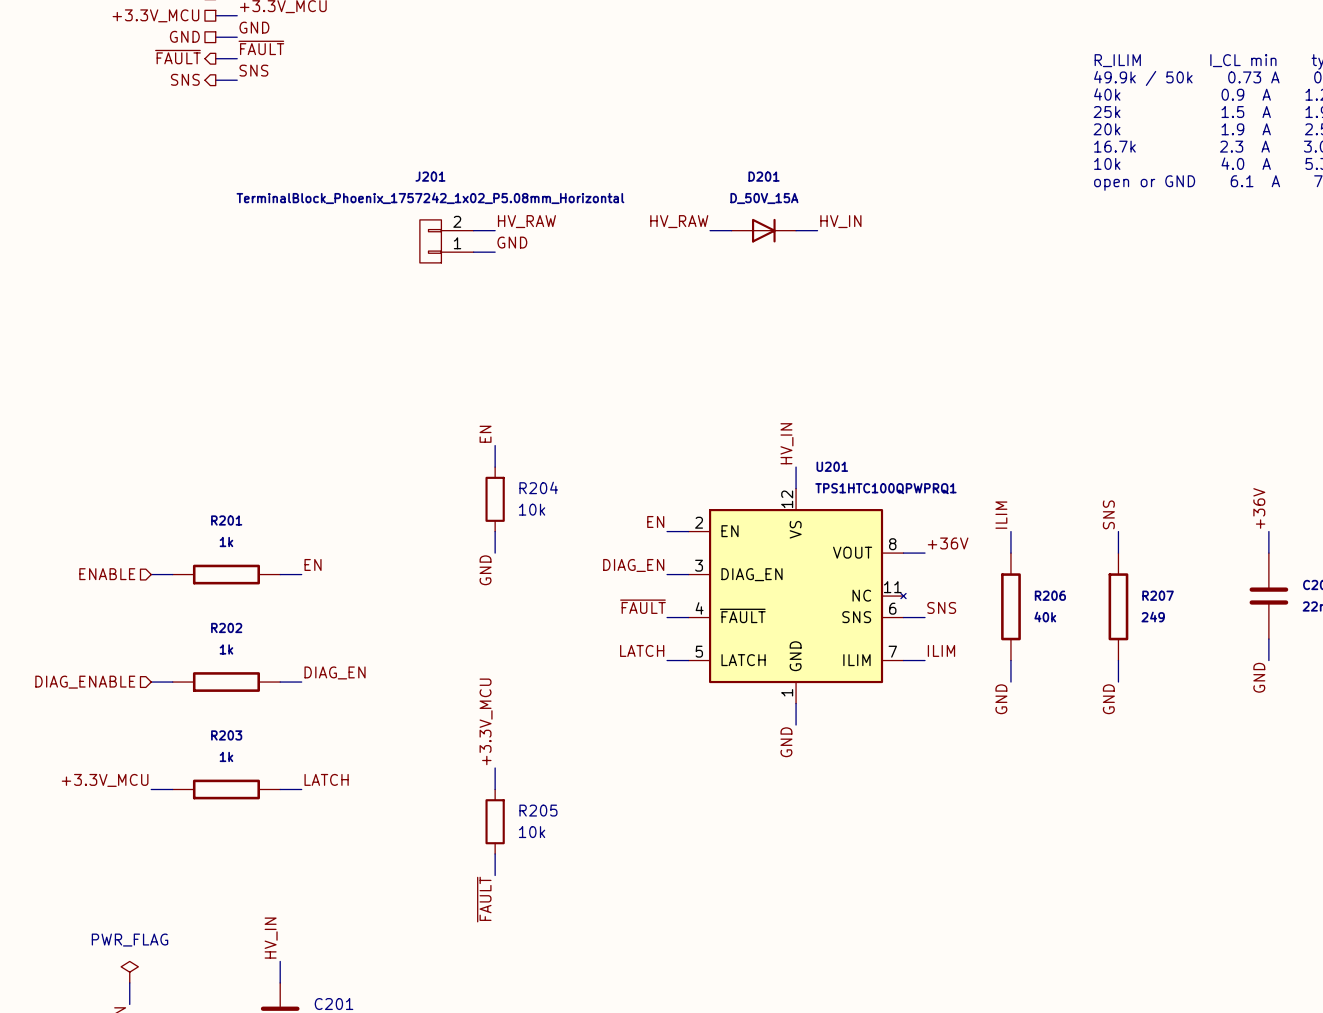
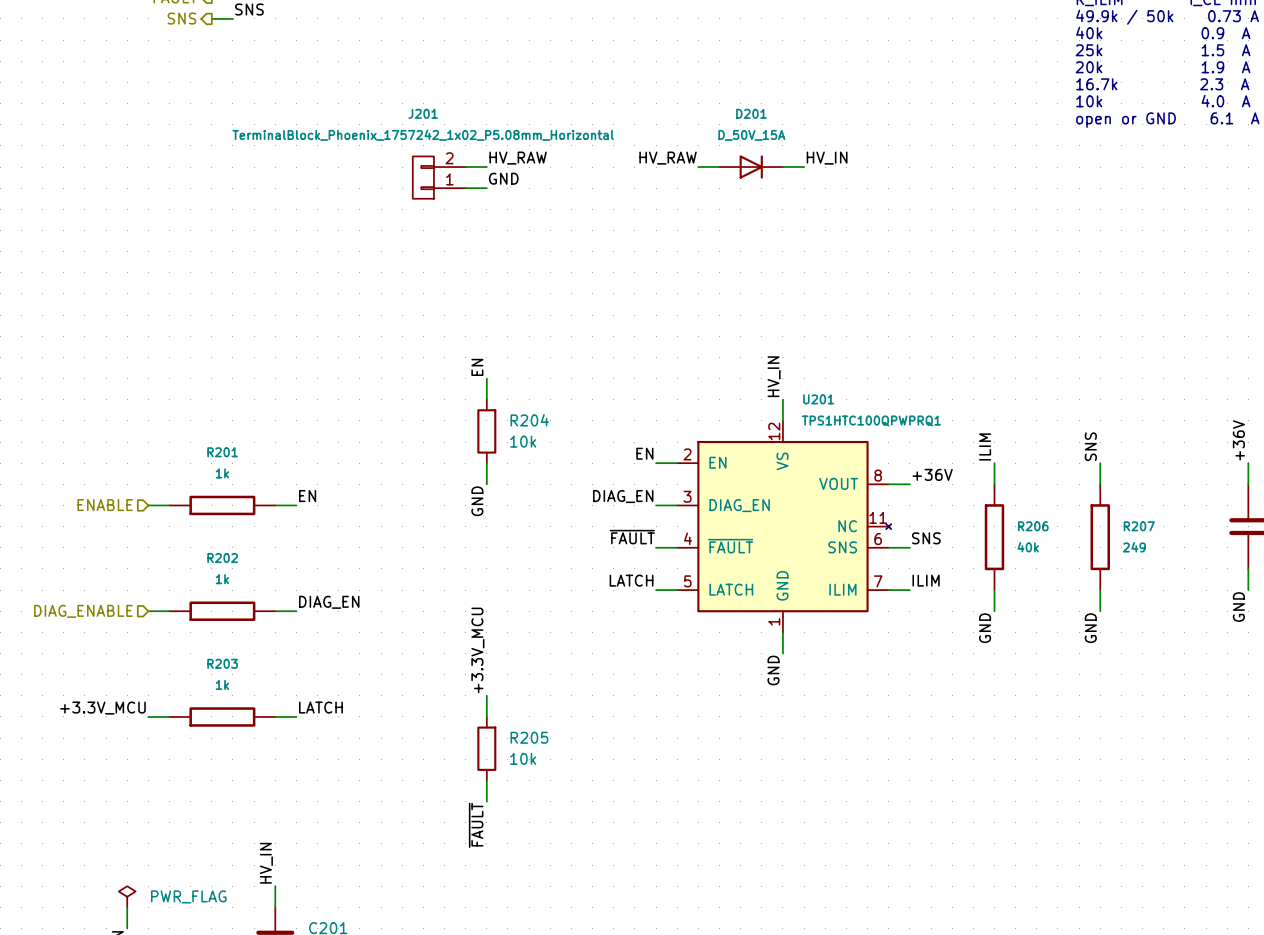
power symbol text position: PWR_FLAG (130, 940) -> PWR_FLAG (188, 896)

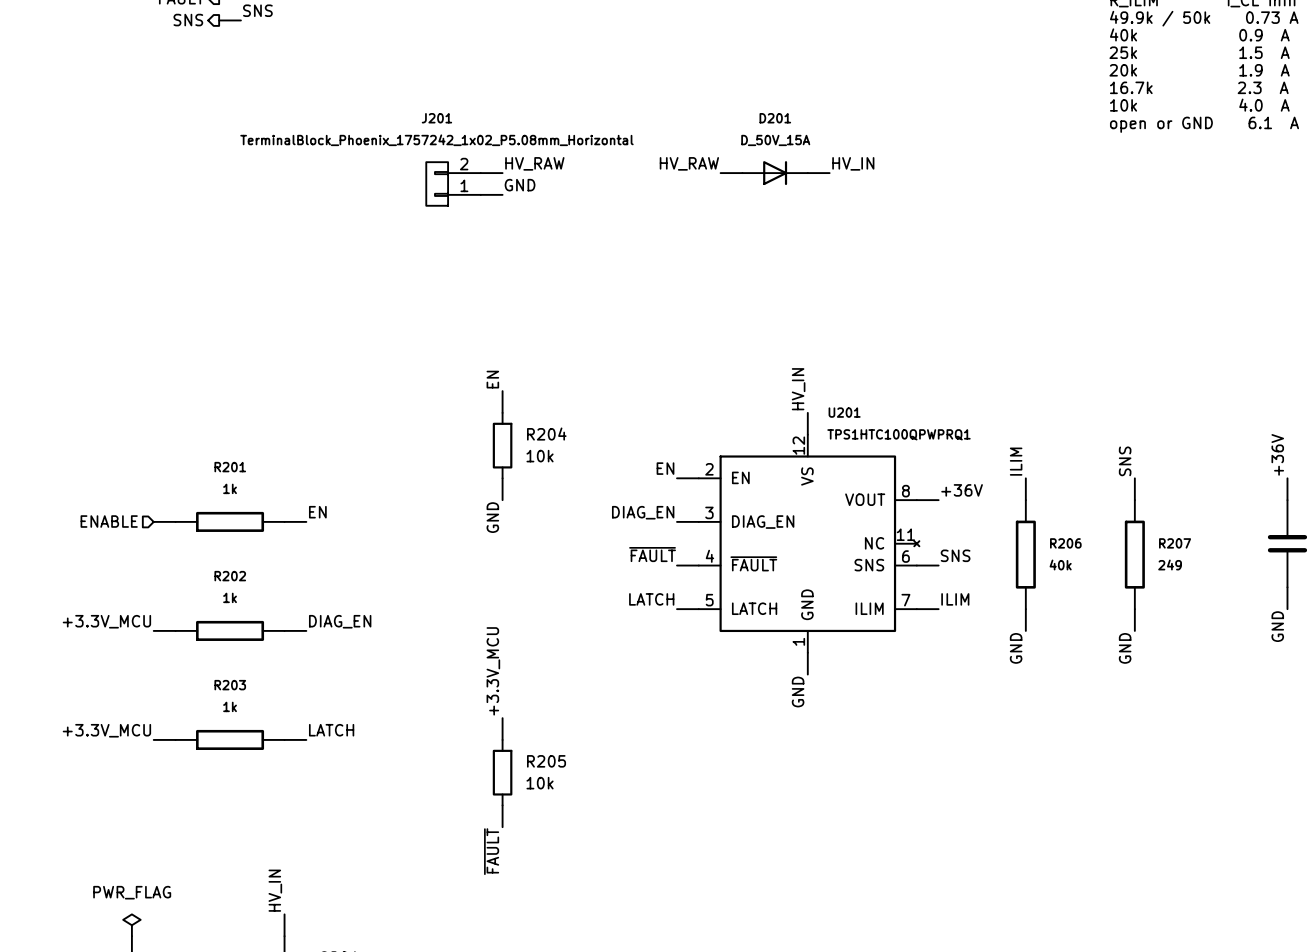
label: none -> +3.3V_MCU (106, 621)
hierarchical label: DIAG_ENABLE (83, 611) -> none
power symbol text position: PWR_FLAG (188, 896) -> PWR_FLAG (132, 892)

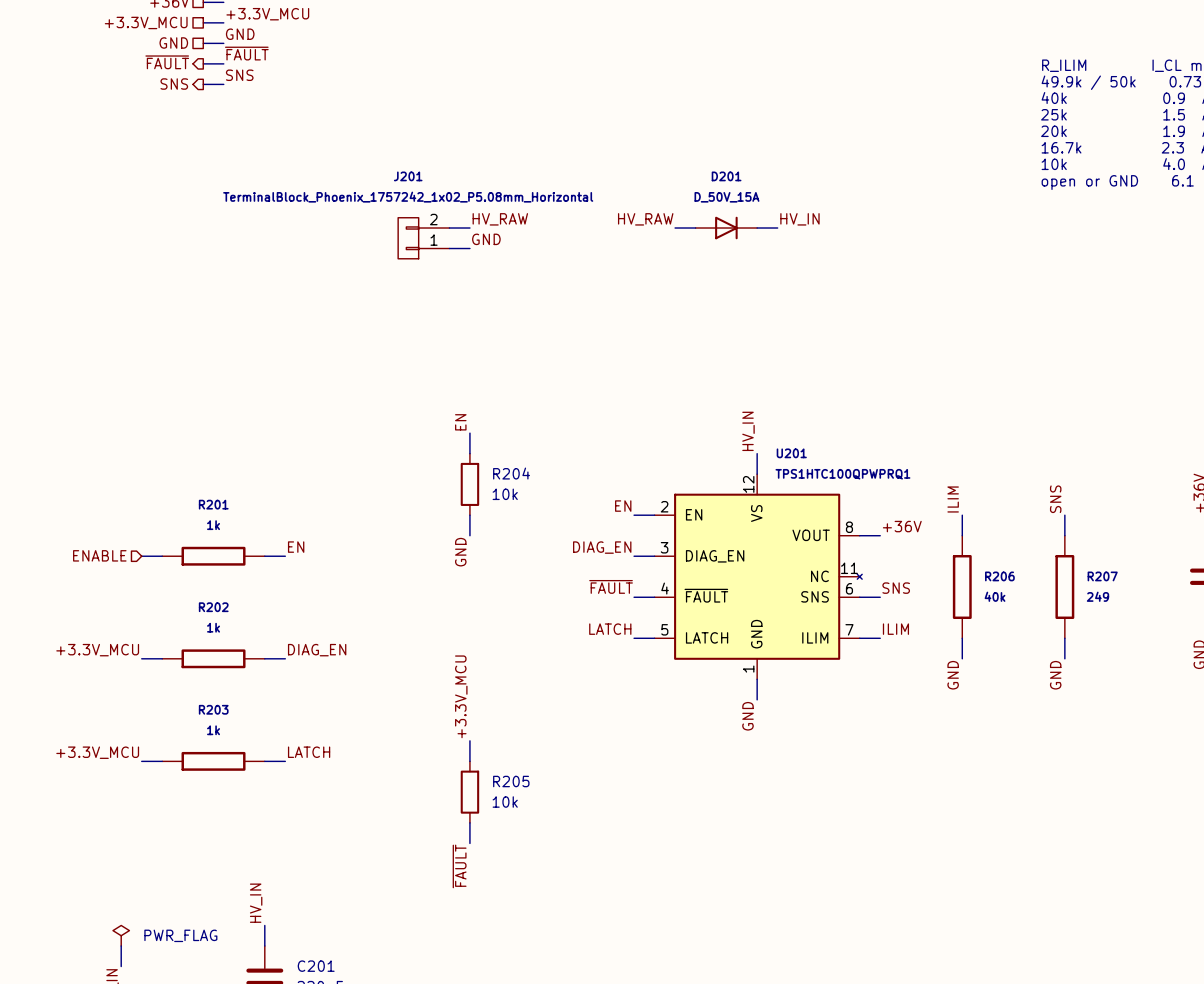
power symbol text position: PWR_FLAG (132, 892) -> PWR_FLAG (180, 935)

